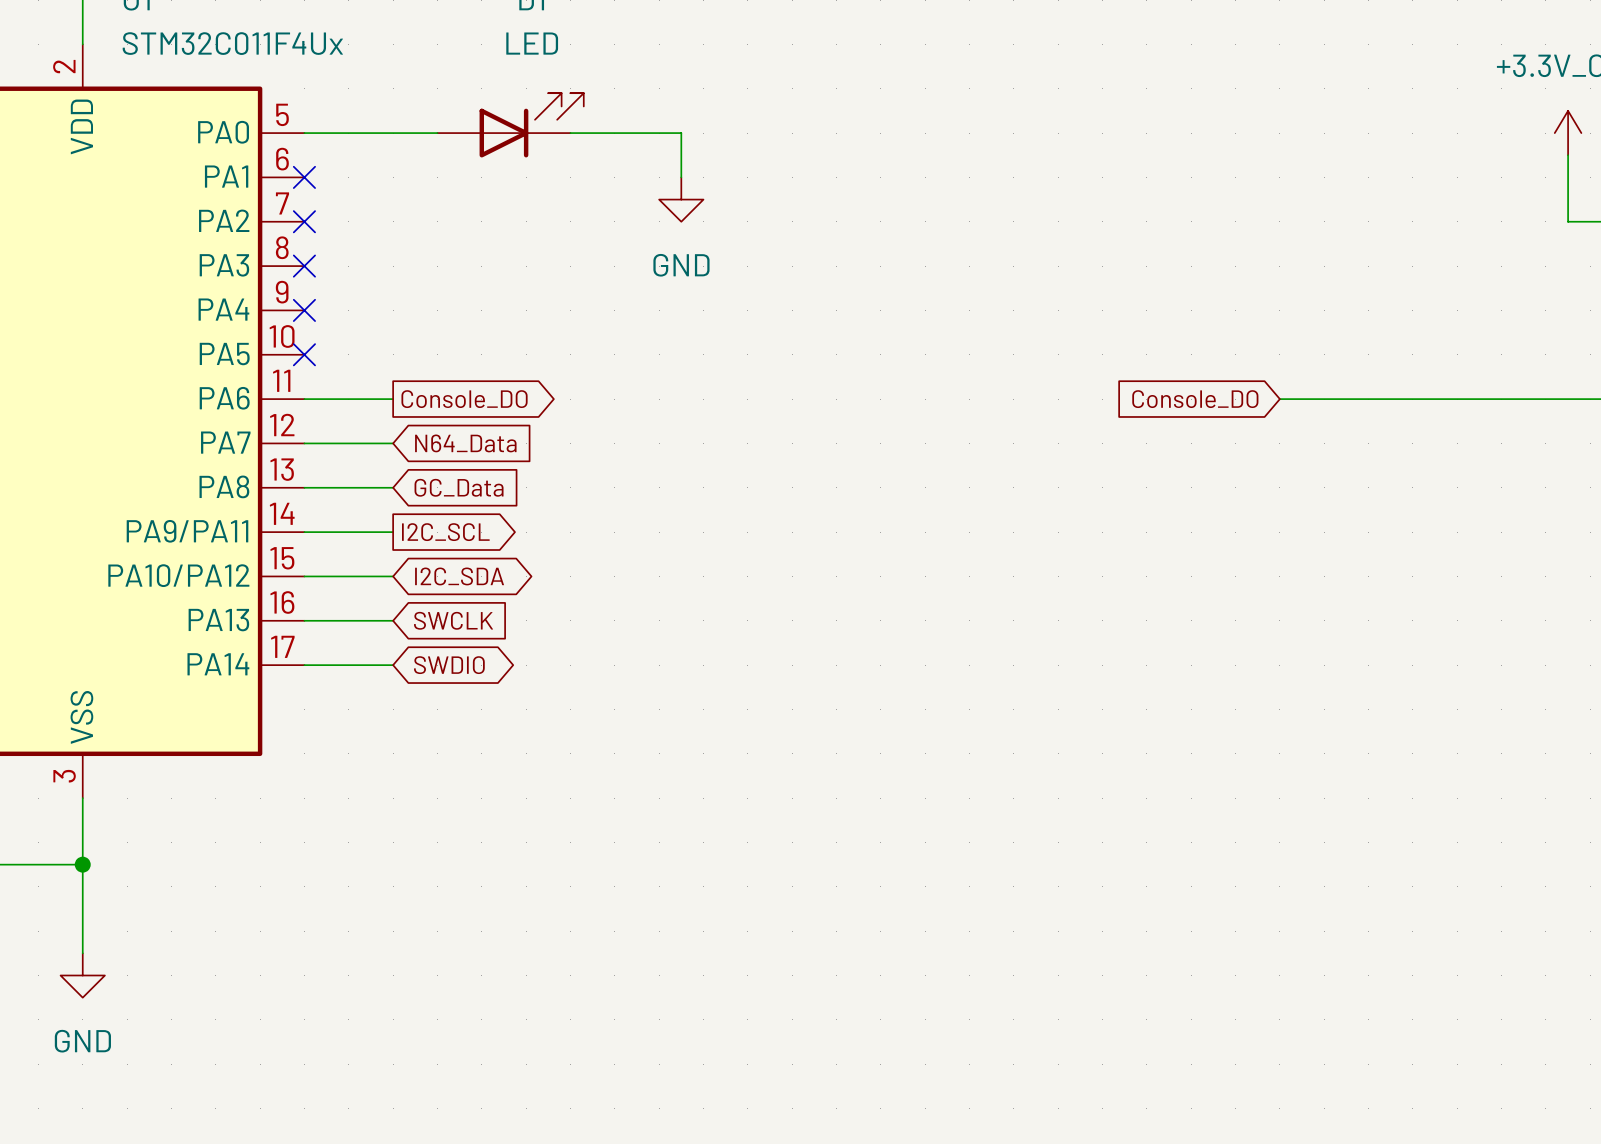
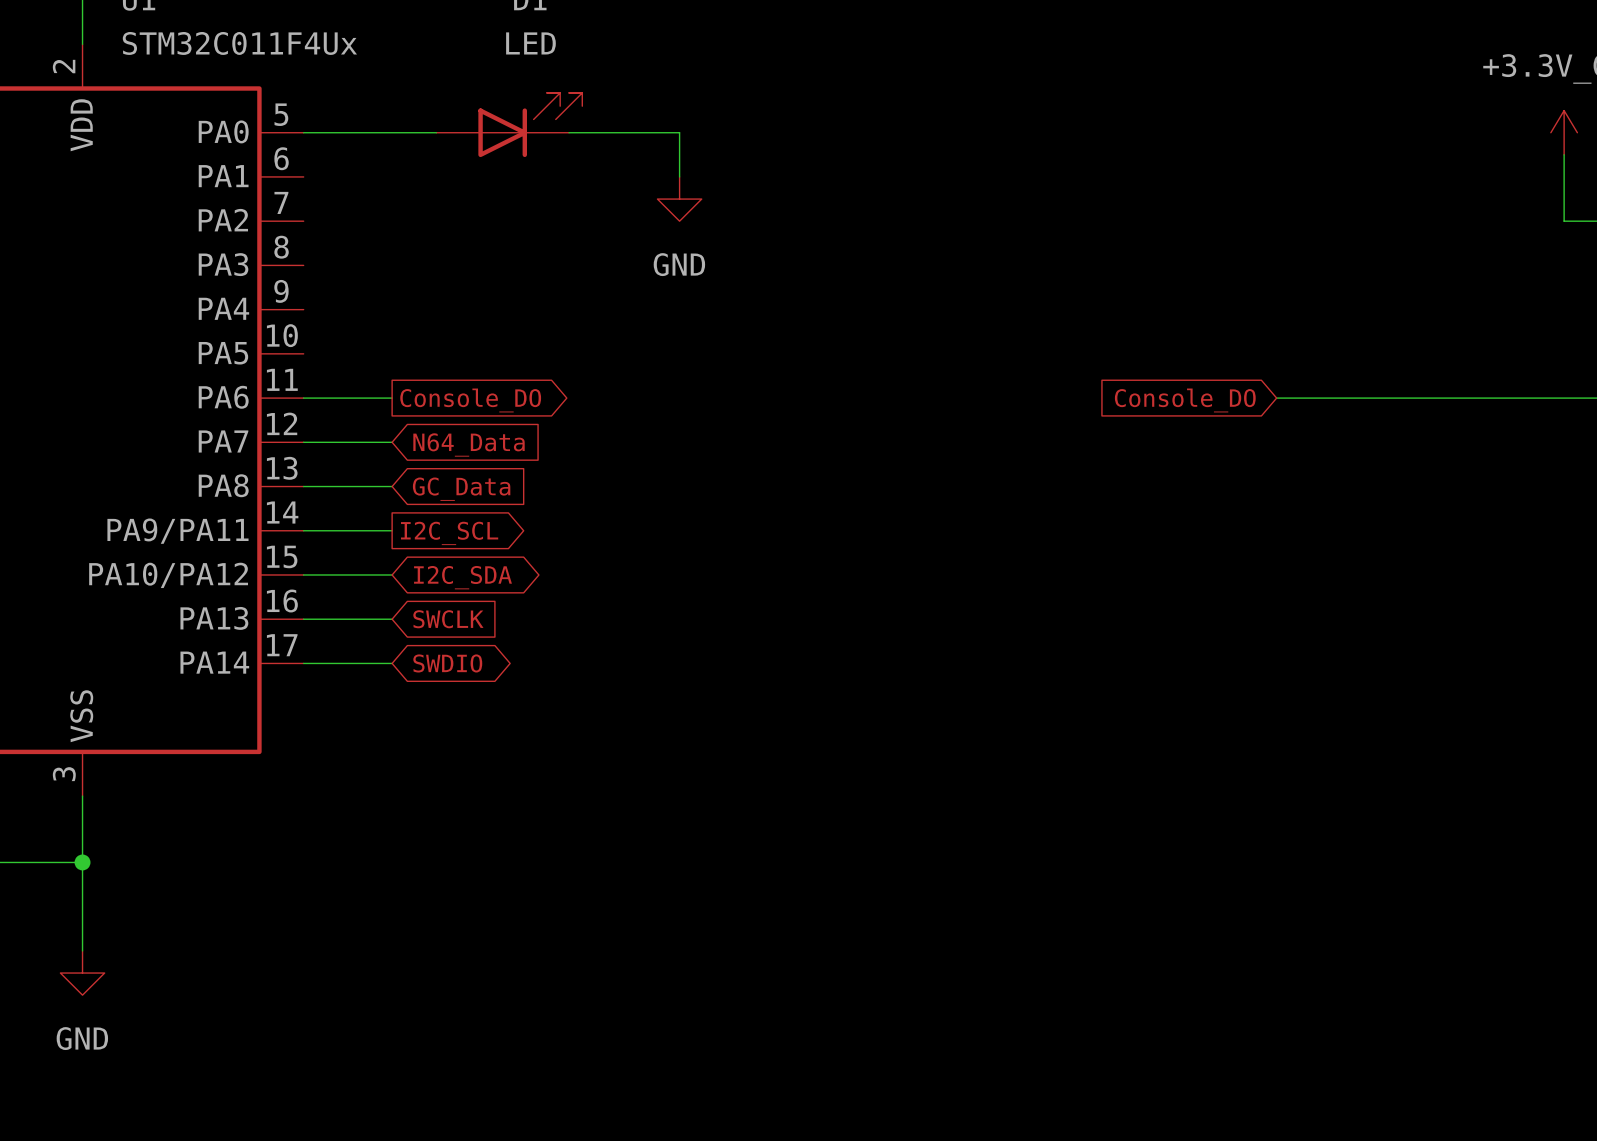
no-connect mark: (304, 177) -> none
no-connect mark: (304, 221) -> none
no-connect mark: (304, 266) -> none
no-connect mark: (304, 310) -> none
no-connect mark: (304, 354) -> none

